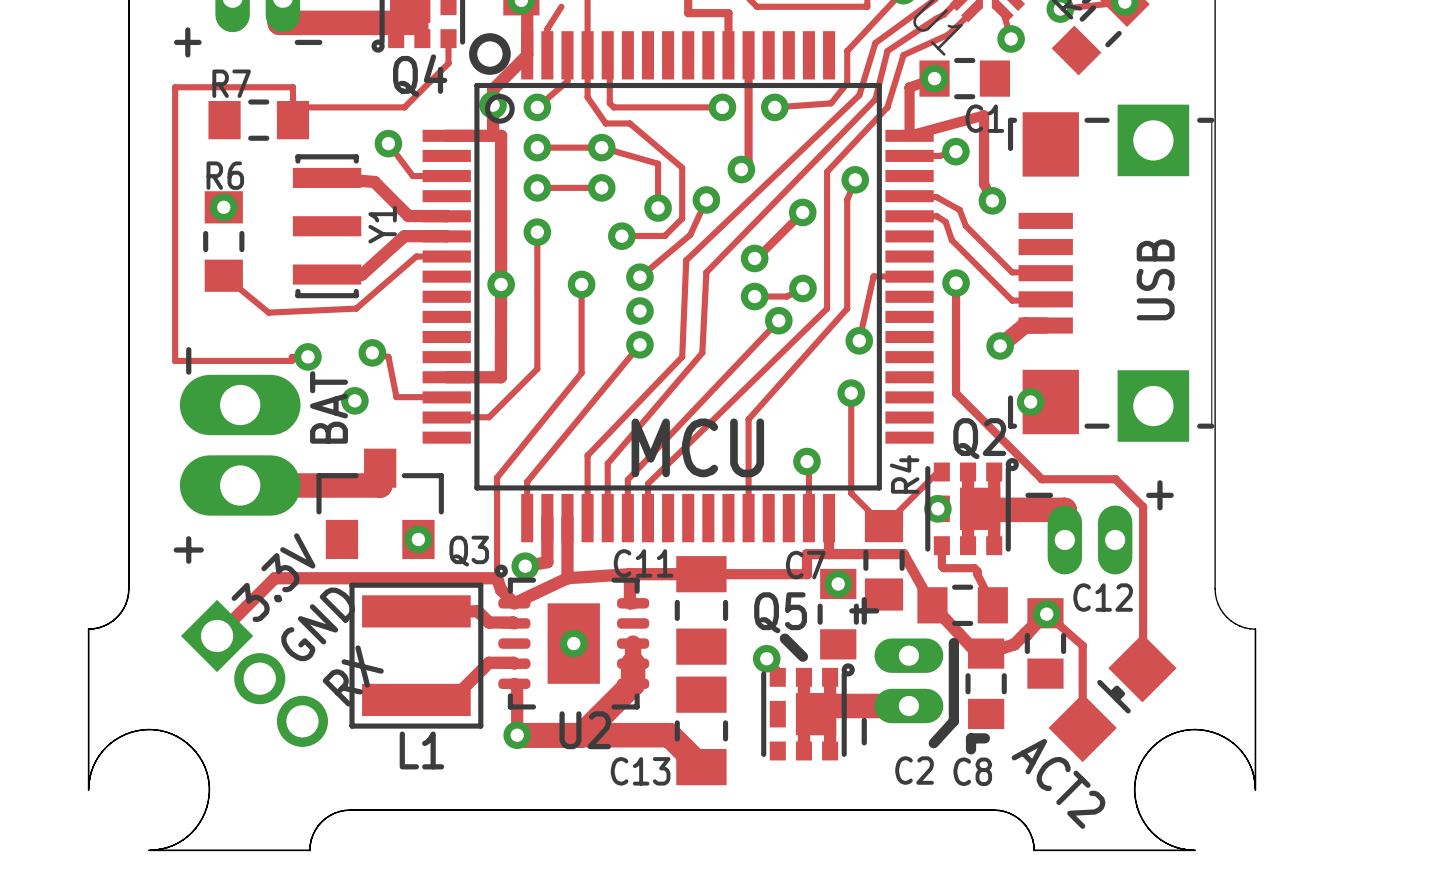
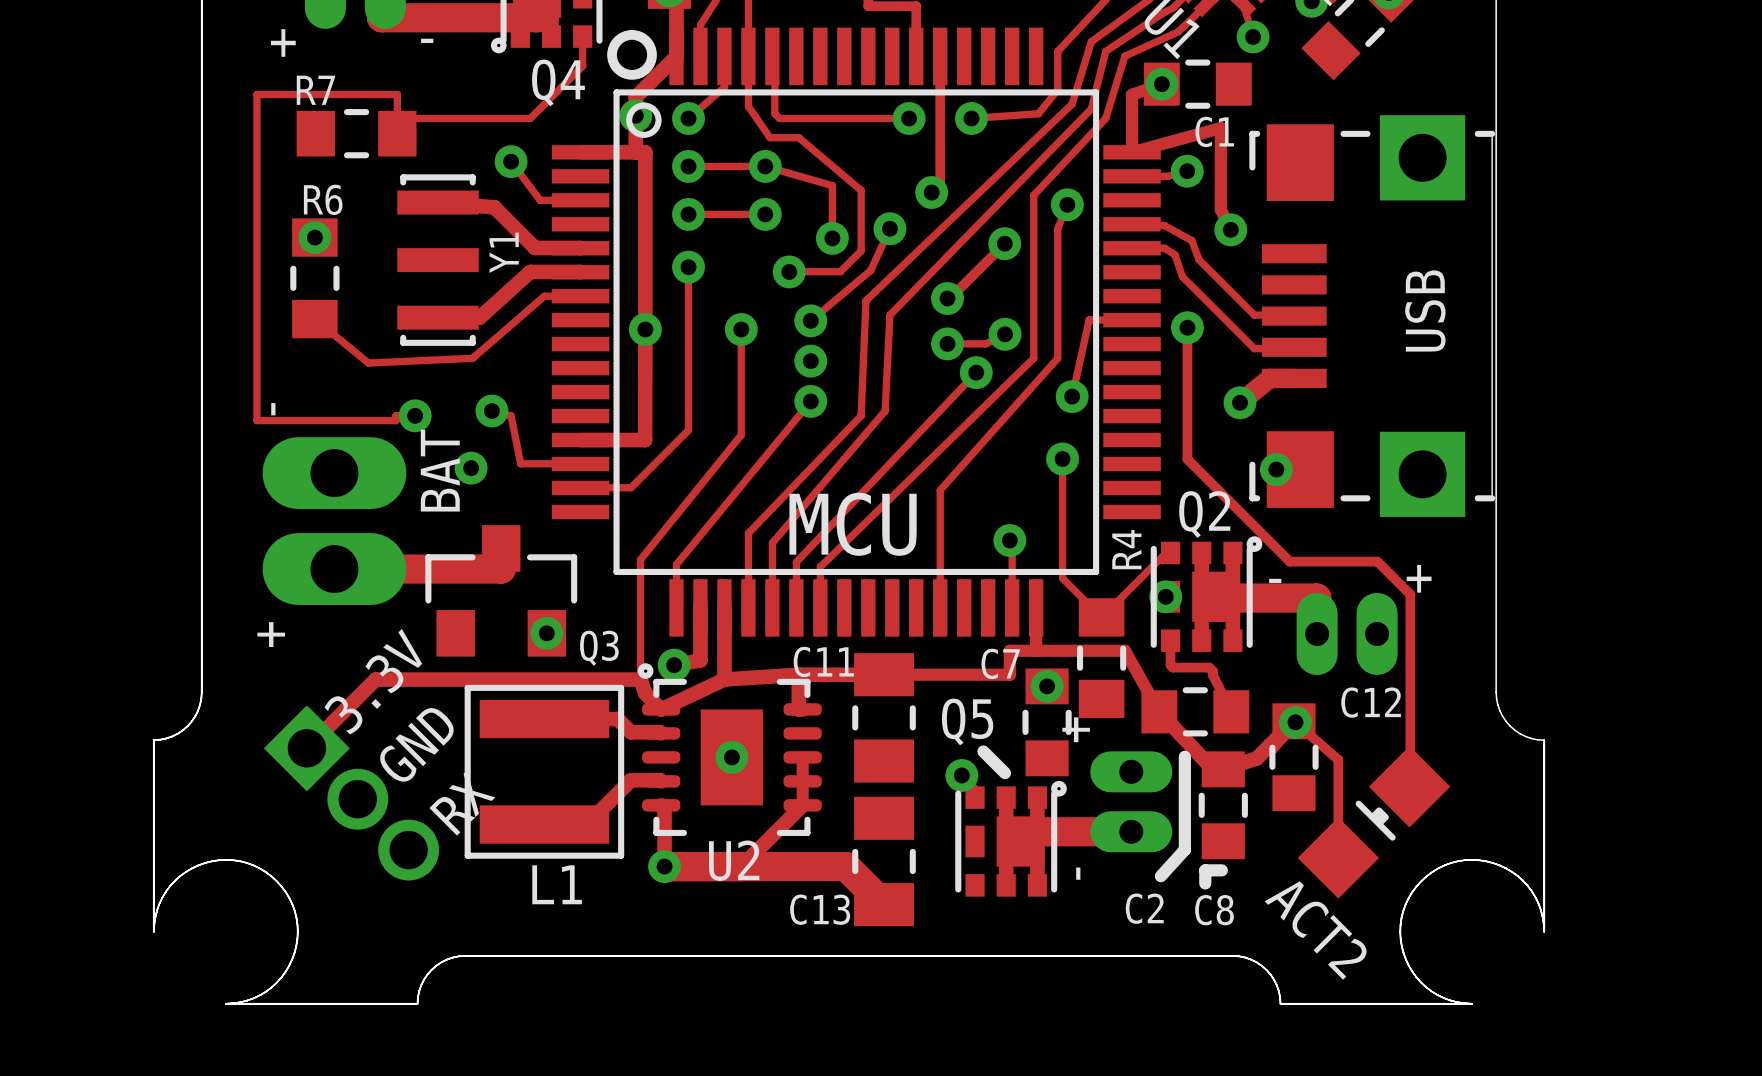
track width: thick (633, 643) (633, 683) (581, 735) -> thin (802, 757) (802, 805) (741, 866)

